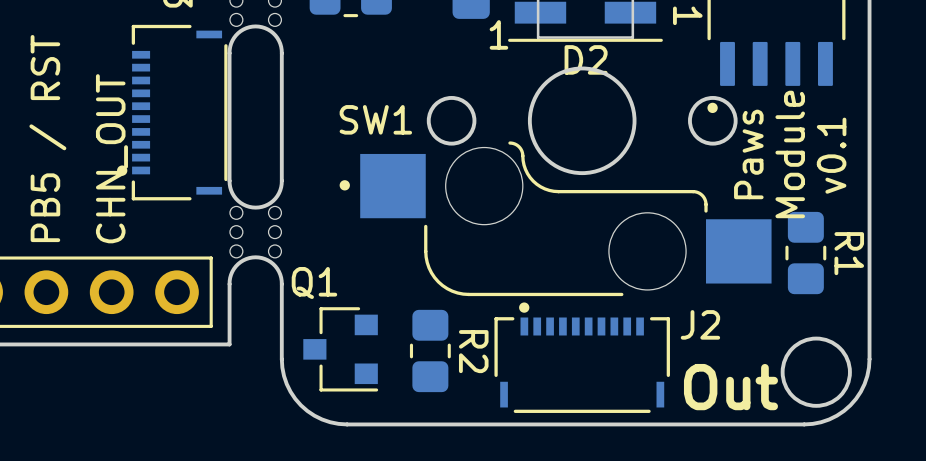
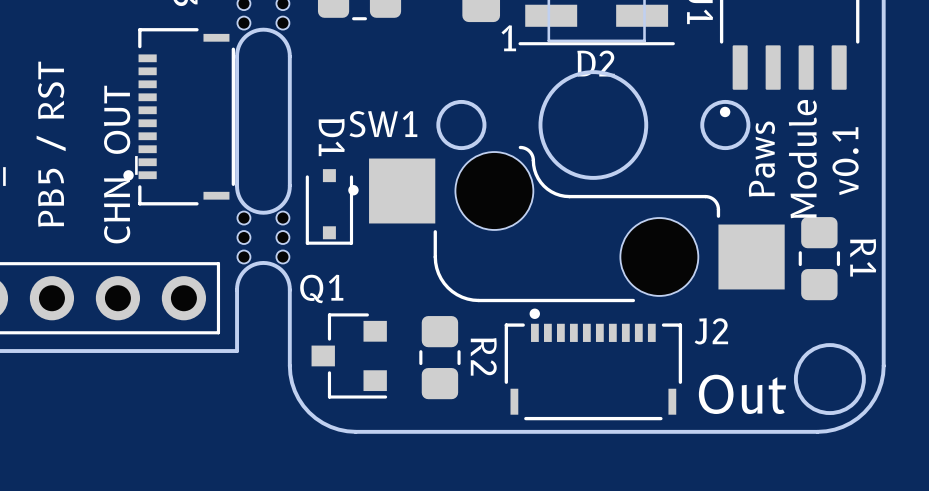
D1: none -> (329, 206)

